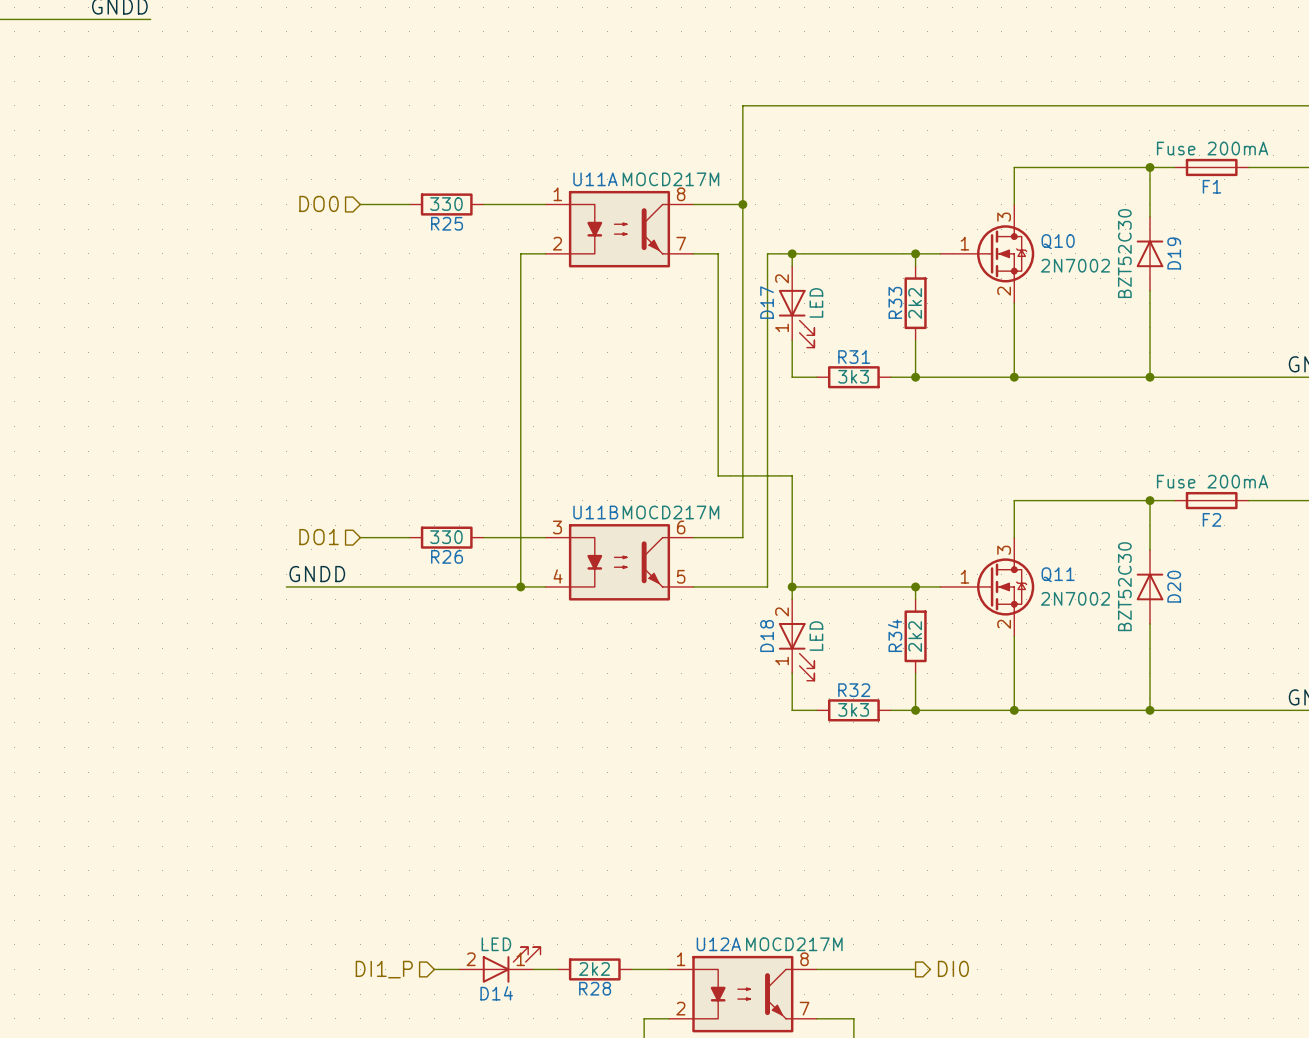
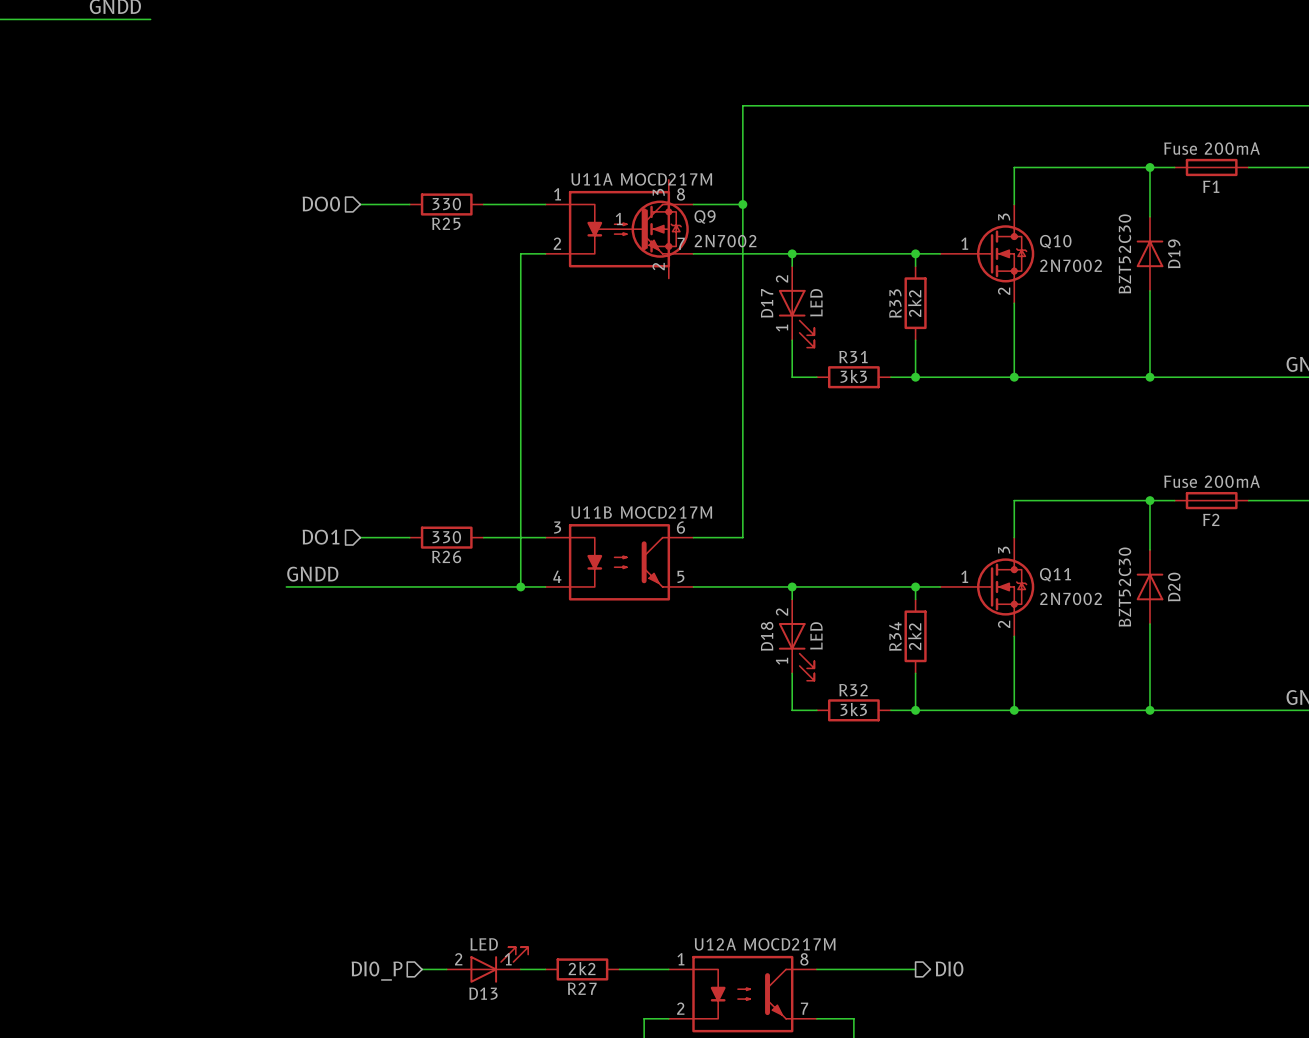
Q9: none -> 2N7002 (641, 229)
wire: (718, 253) (718, 475) (792, 475) (792, 586) -> (718, 253) (767, 253)
wire: (767, 253) (767, 586) -> (792, 586) (767, 586)
D13: none -> LED (487, 965)
D14: LED (499, 965) -> none
hierarchical label: DI1_P (384, 969) -> DI0_P (377, 971)
R27: none -> 2k2 (582, 969)
R28: 2k2 (594, 969) -> none

